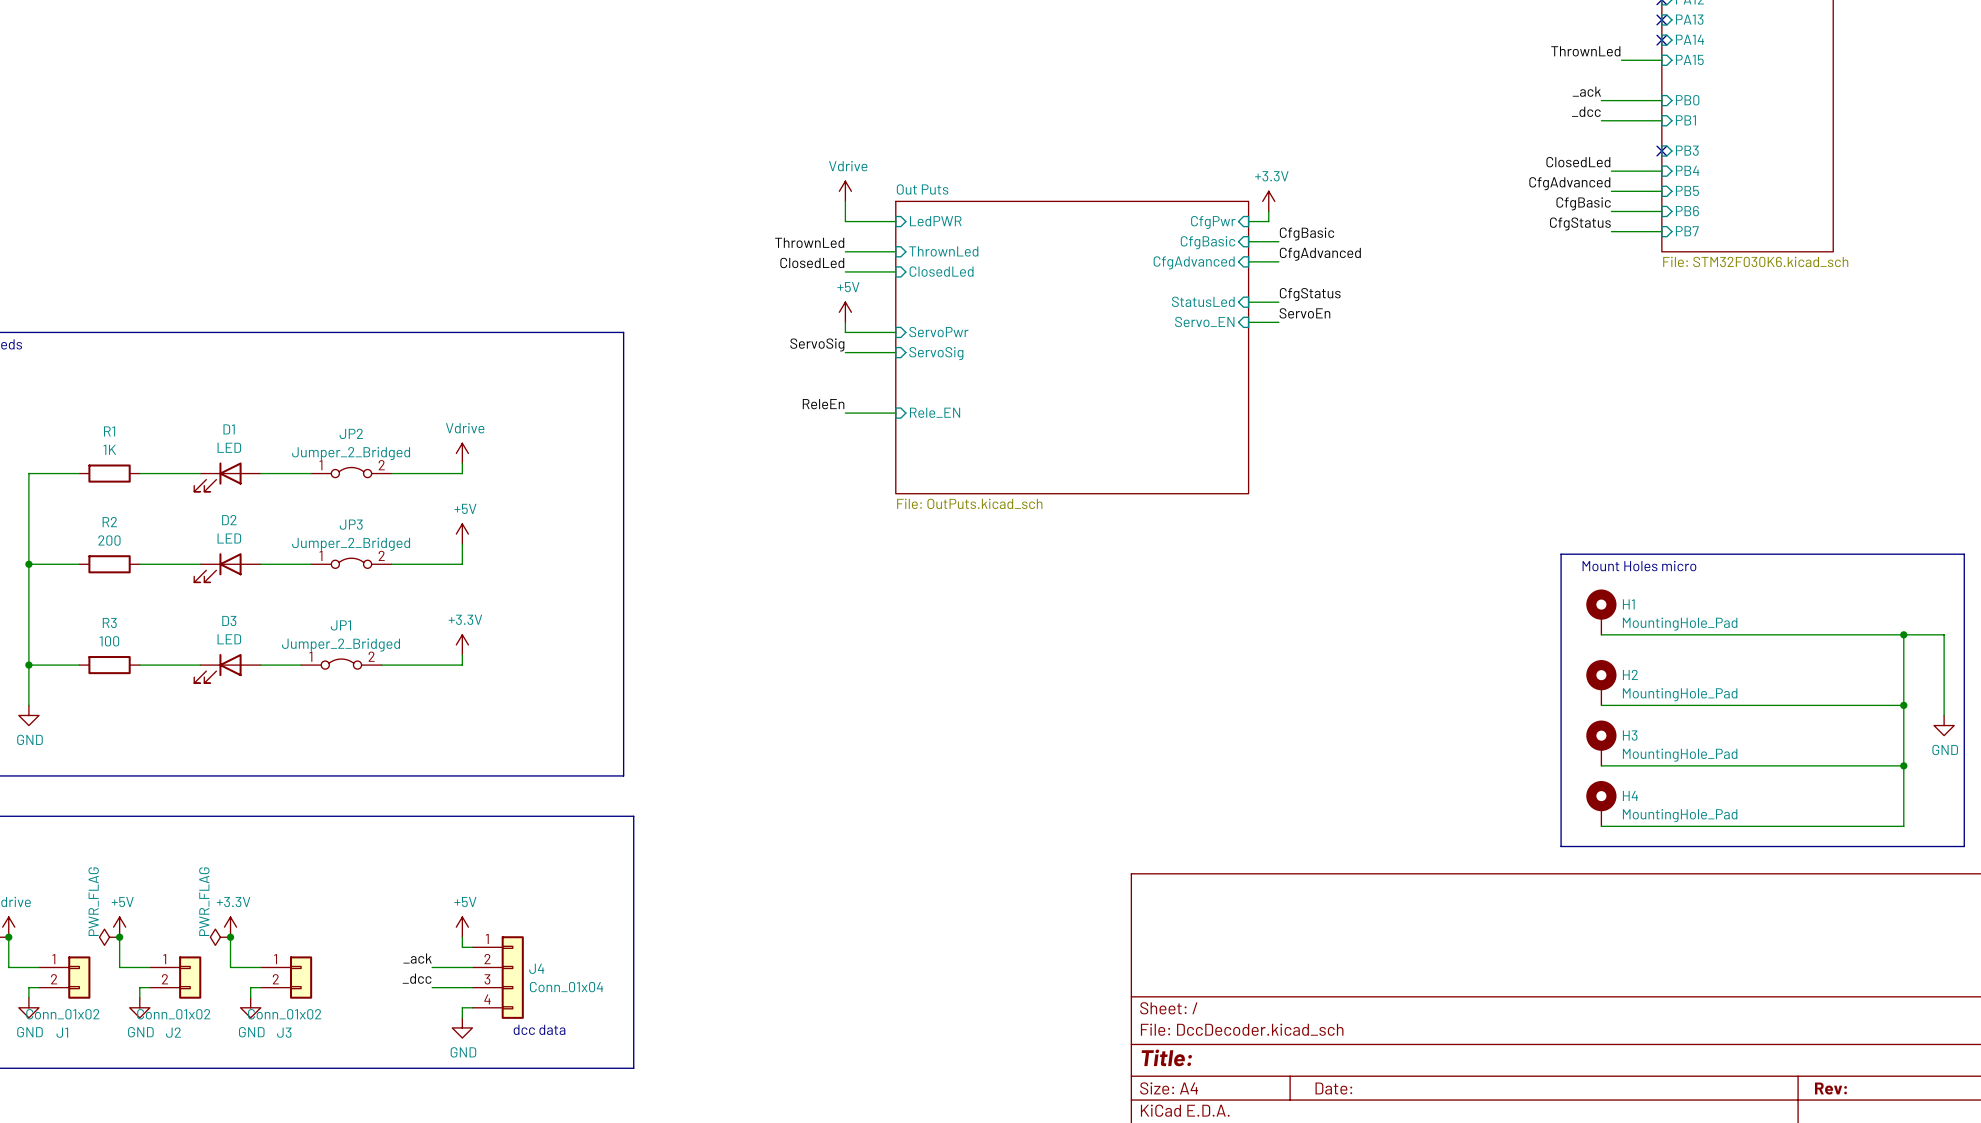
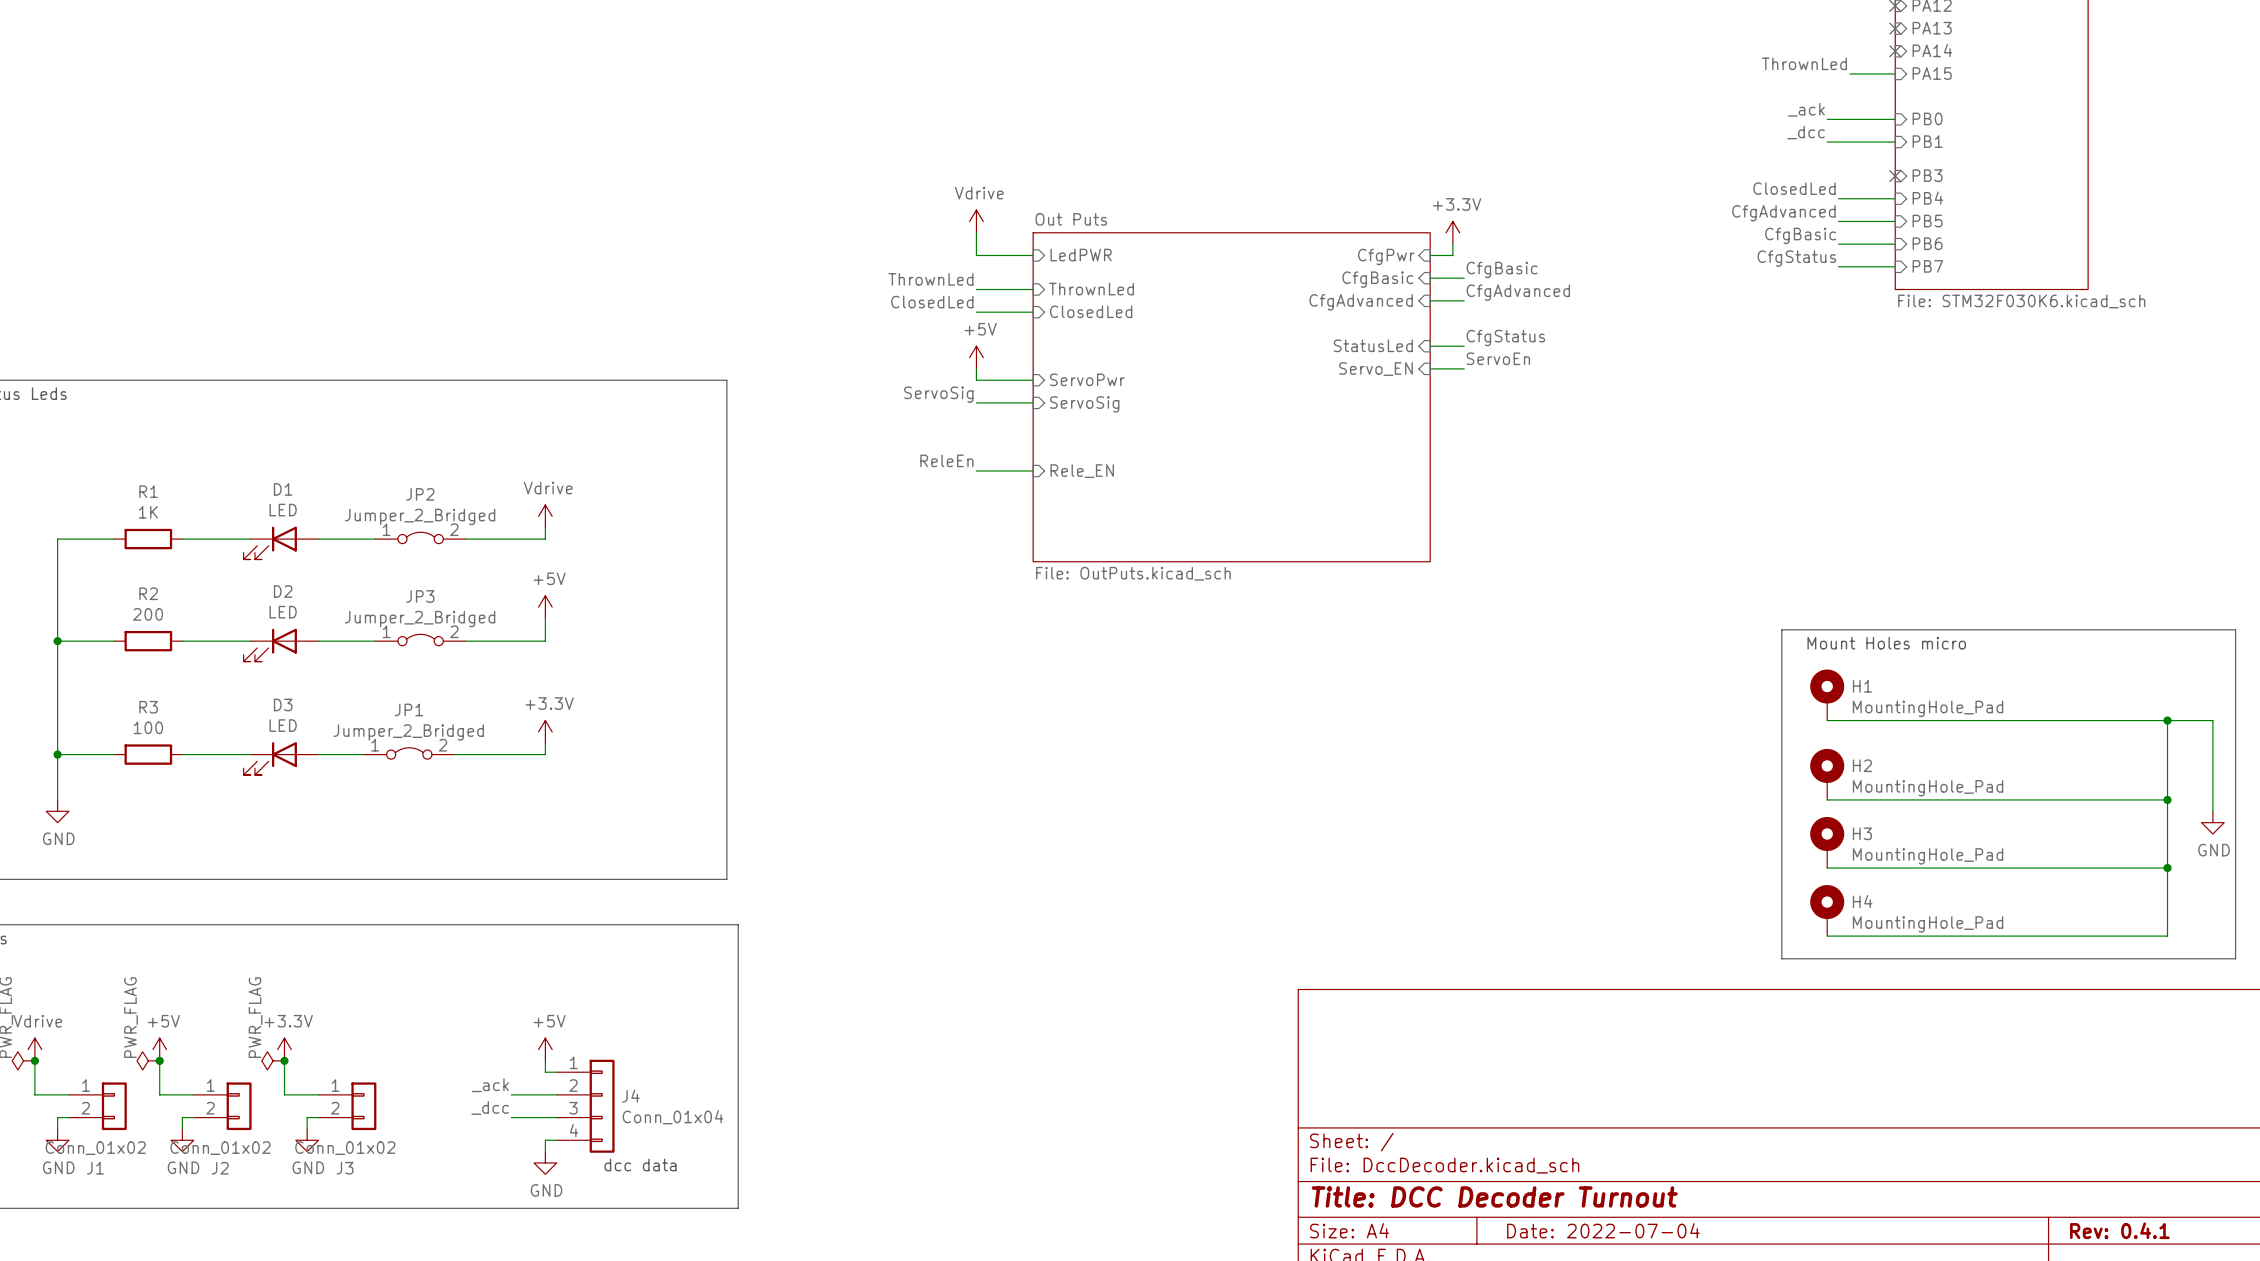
title block: Title: (1166, 1057) -> Title: DCC Decoder Turnout (1494, 1196)
title block: Date: (1333, 1088) -> Date: 2022-07-04 (1603, 1230)
title block: Rev: (1830, 1088) -> Rev: 0.4.1 (2119, 1230)

